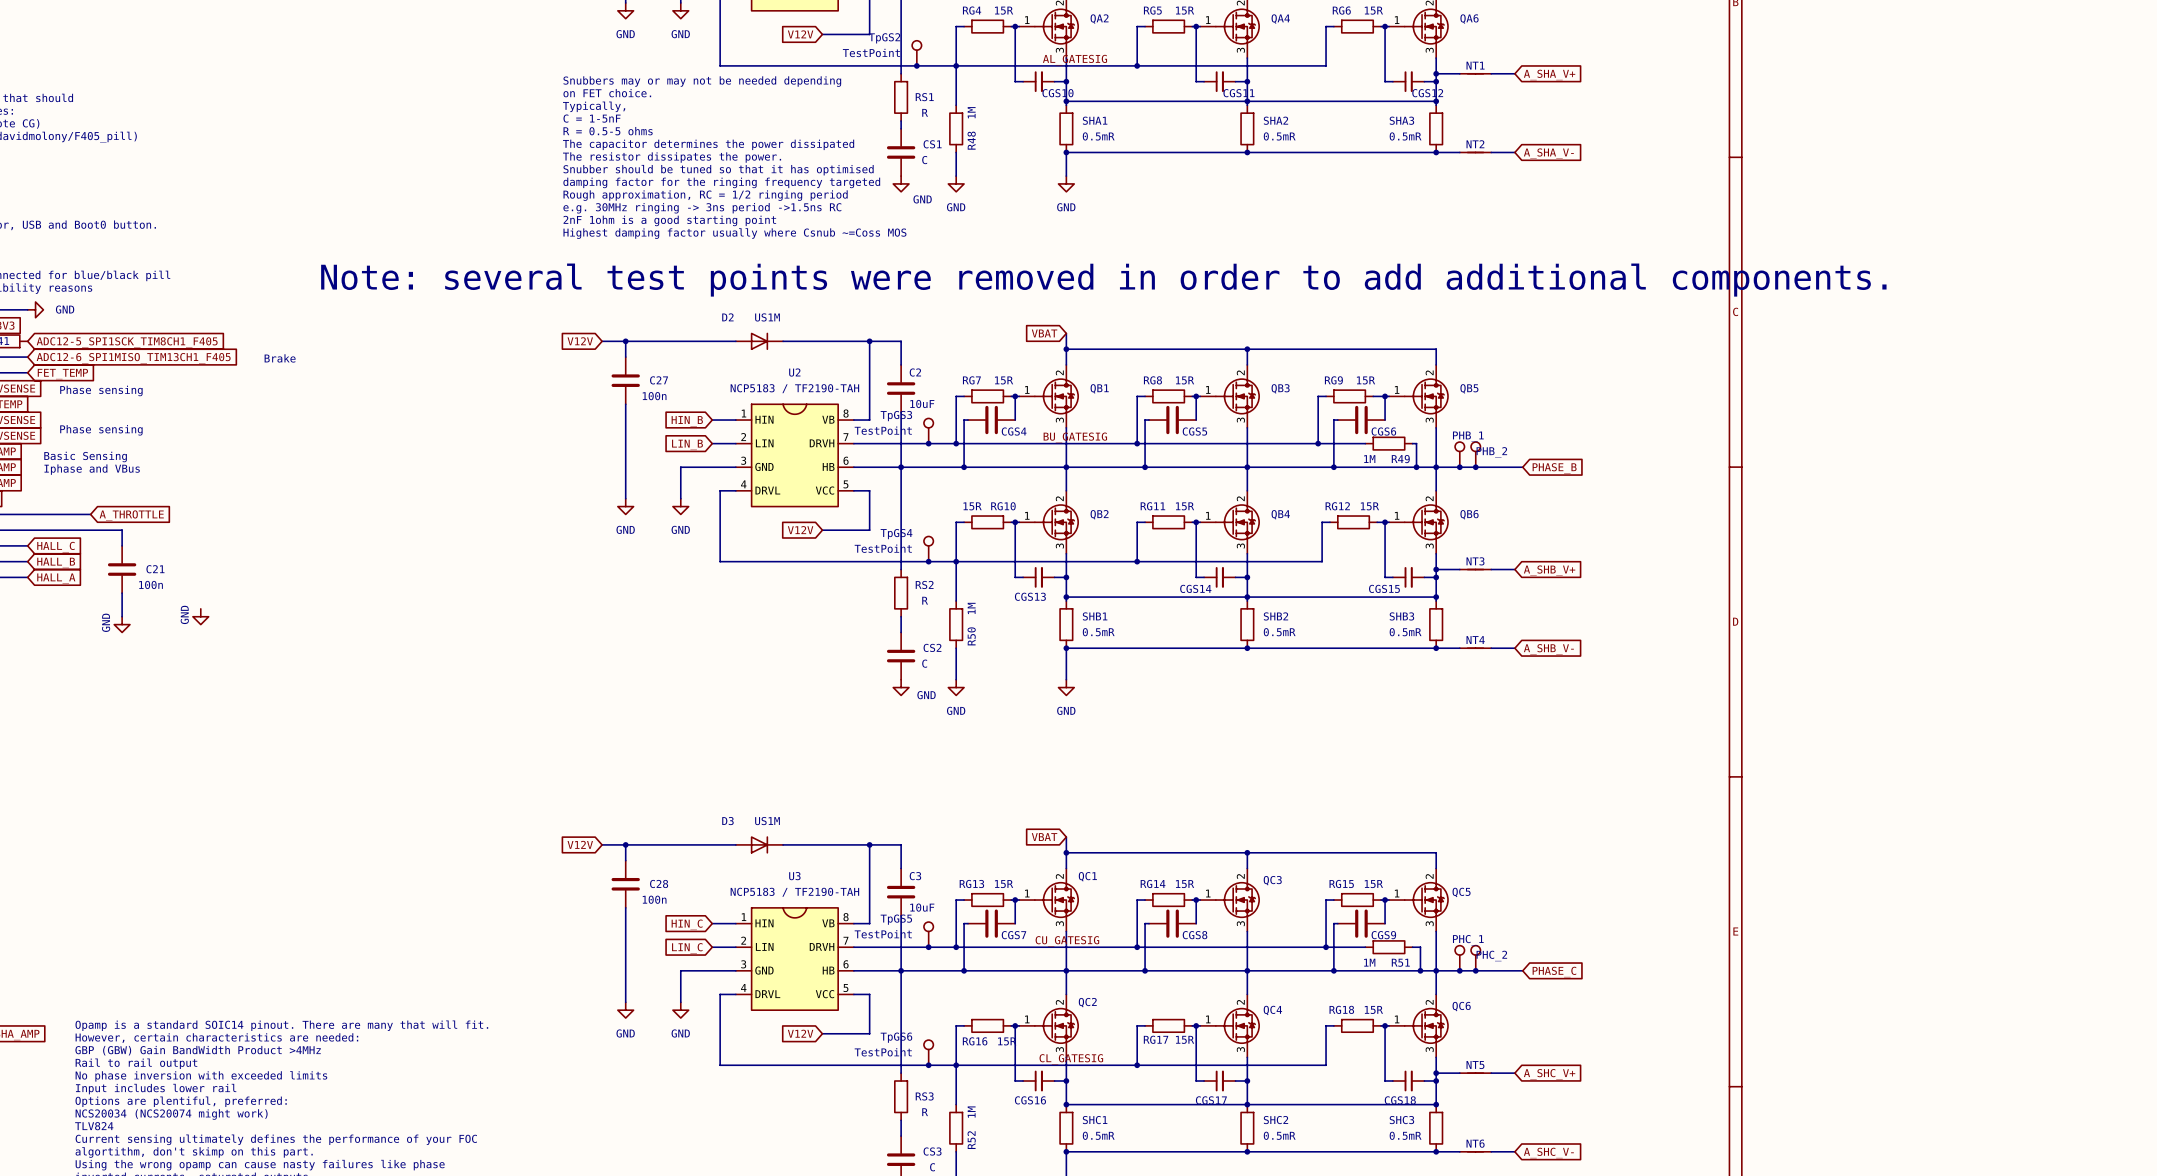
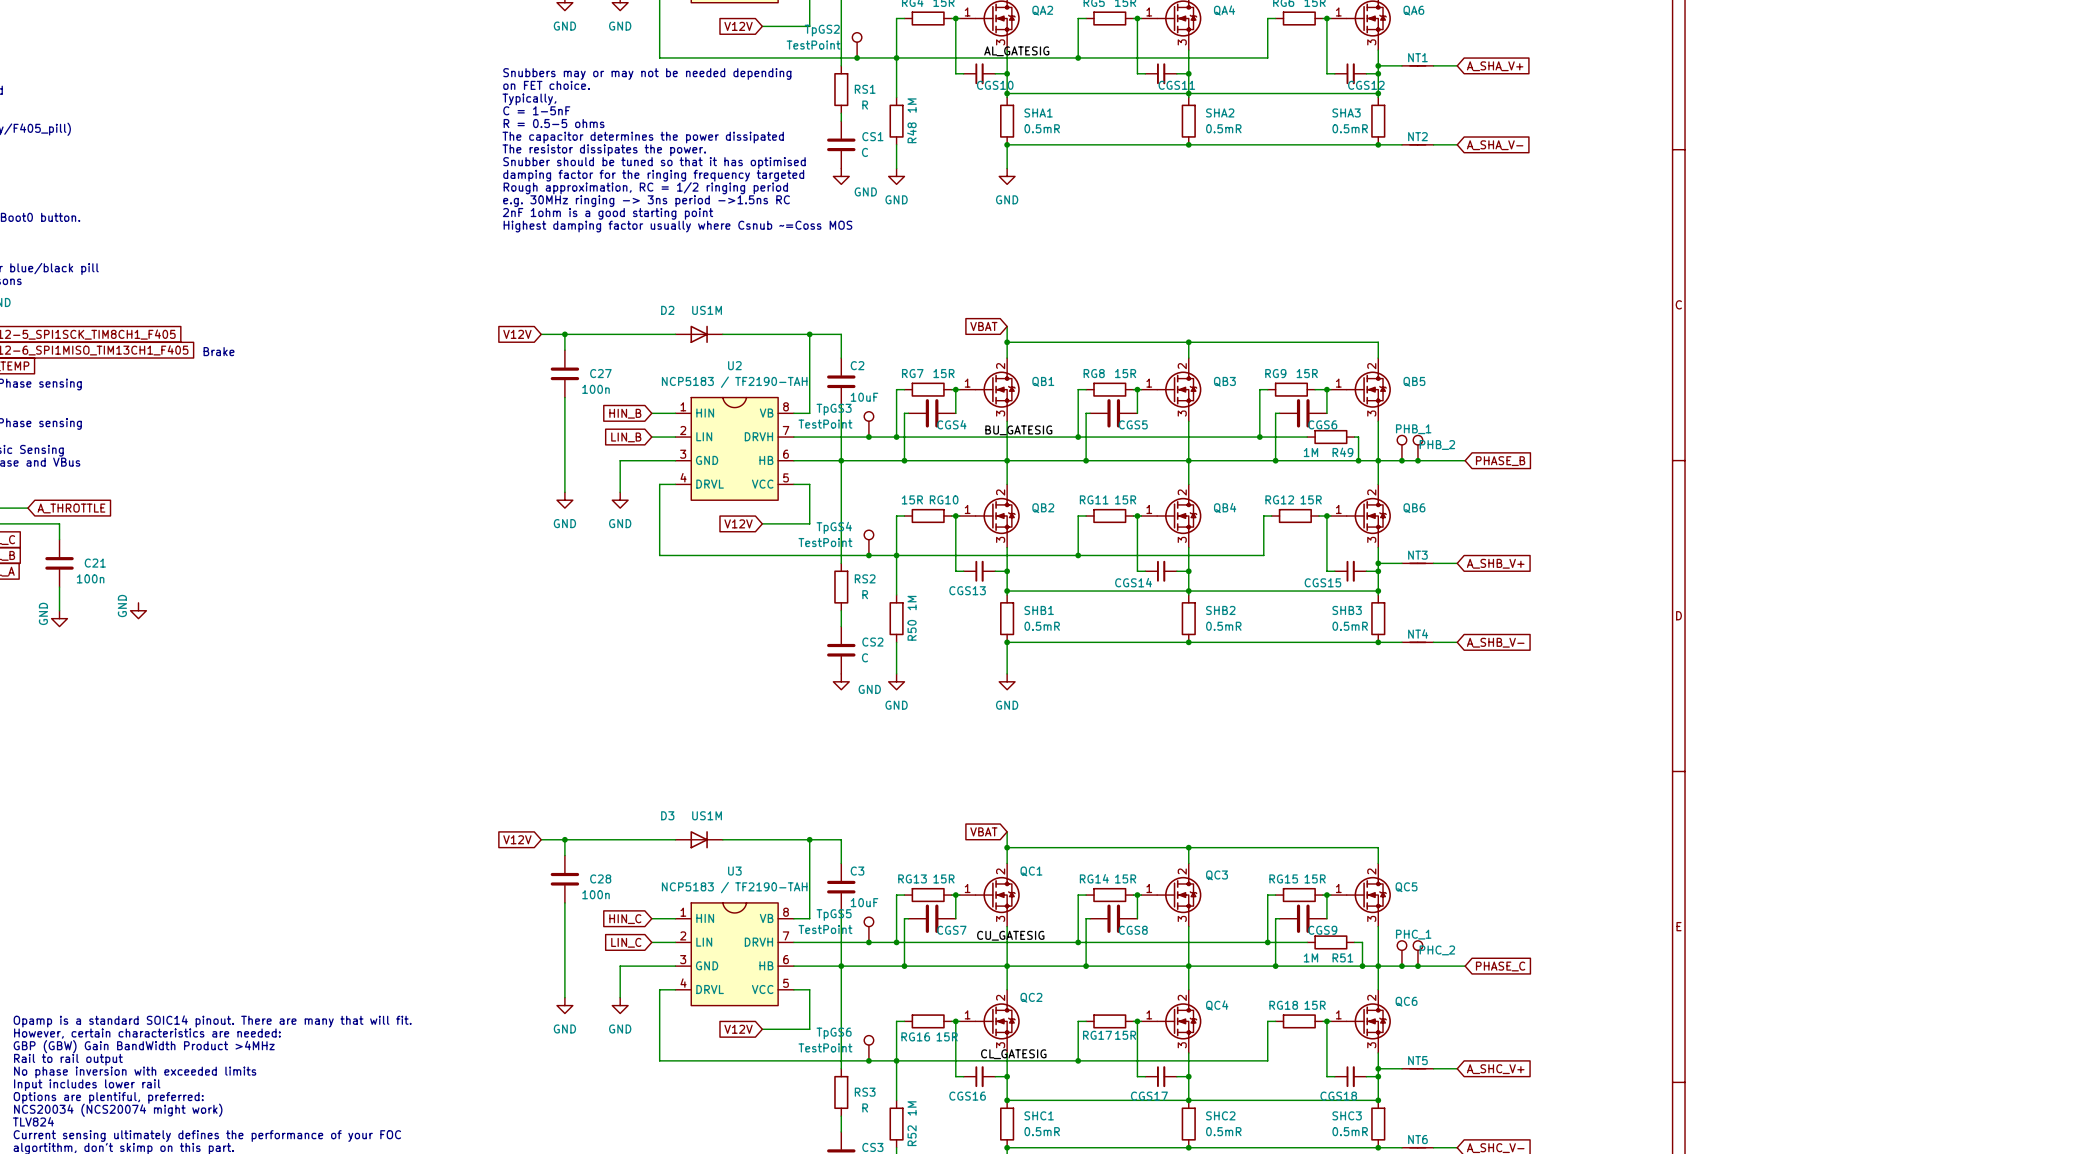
text: Note: several test points were removed in order to add additional components. (1103, 280) -> none

